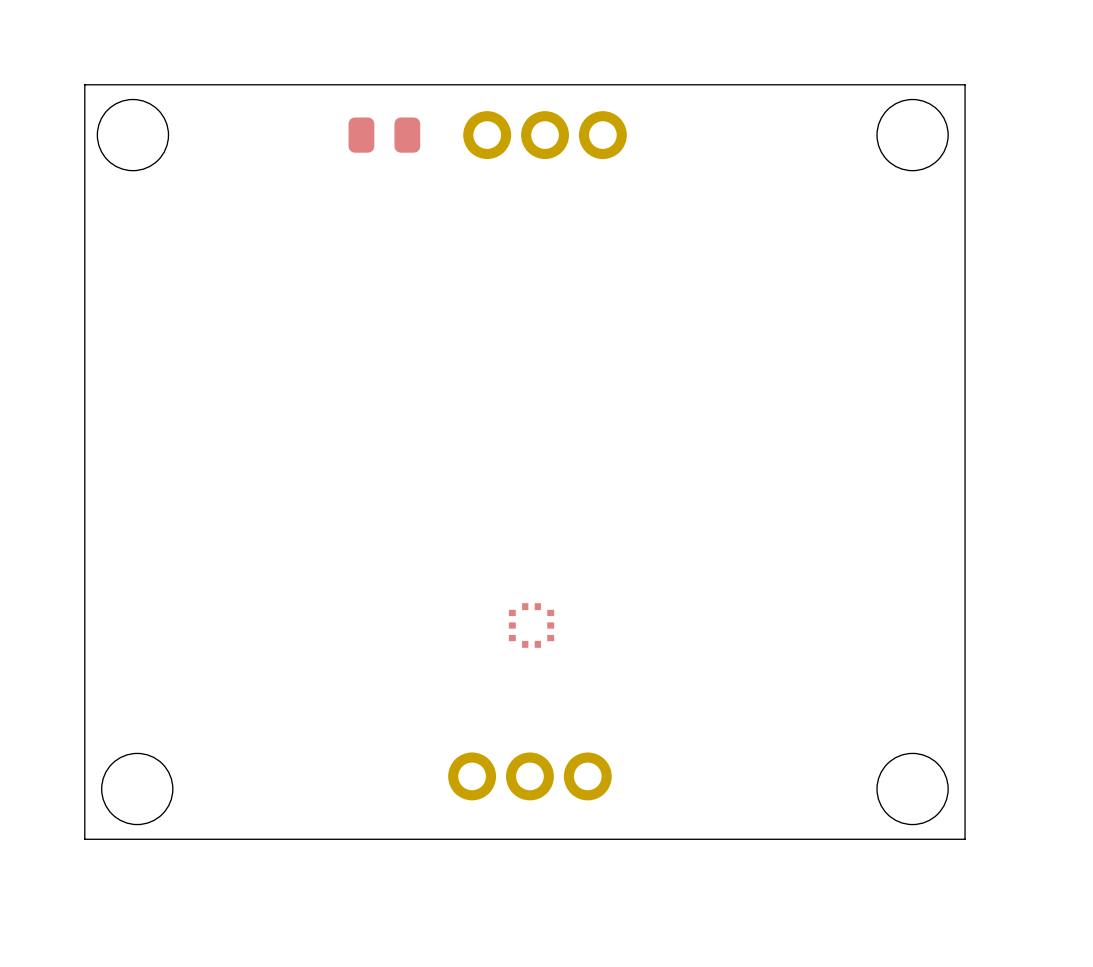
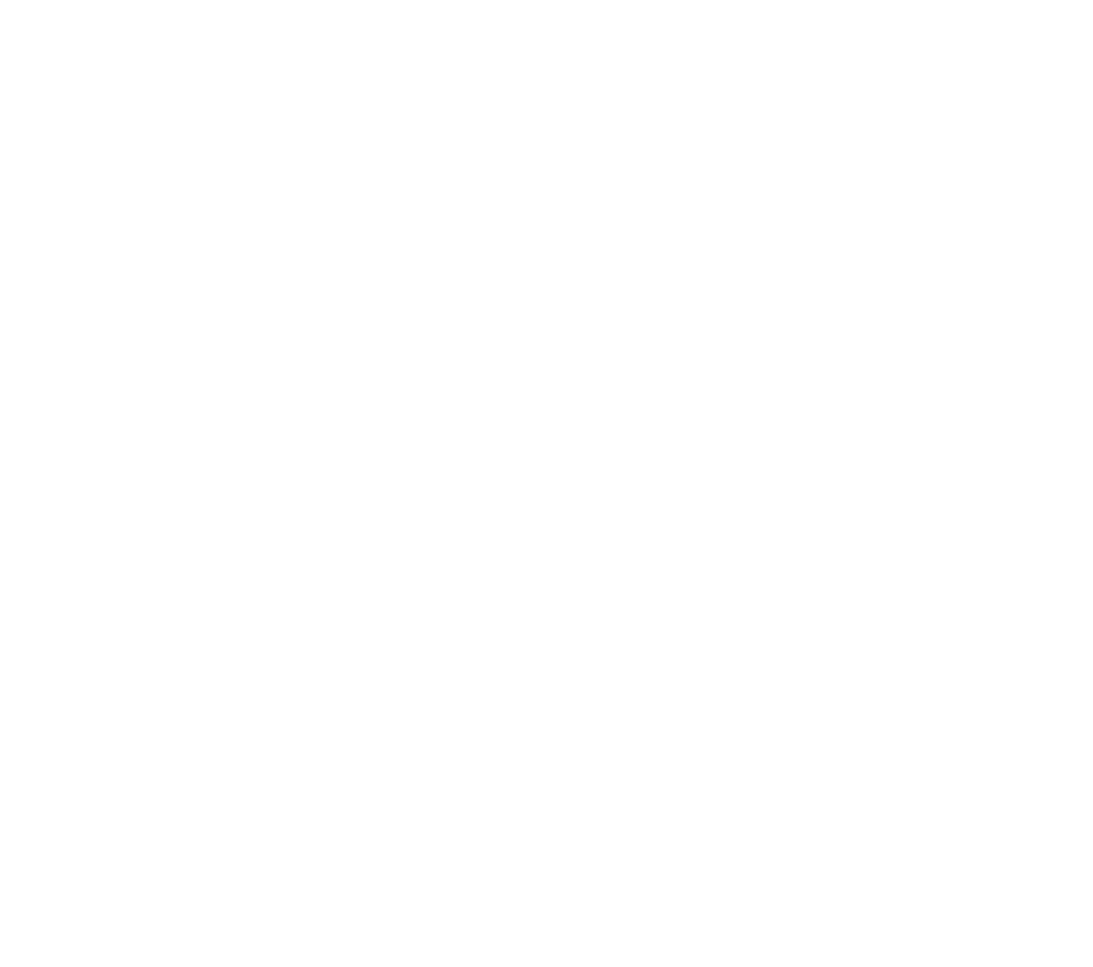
board edge: (965, 84) (84, 84) (84, 839) (965, 839) (965, 84) -> none
round board edge: [96, 98, 170, 172] -> none
round board edge: [876, 98, 949, 172] -> none
part: (384, 135) -> none
part: (545, 135) -> none
part: (531, 625) -> none
round board edge: [101, 752, 174, 826] -> none
round board edge: [876, 752, 949, 826] -> none
part: (529, 776) -> none

